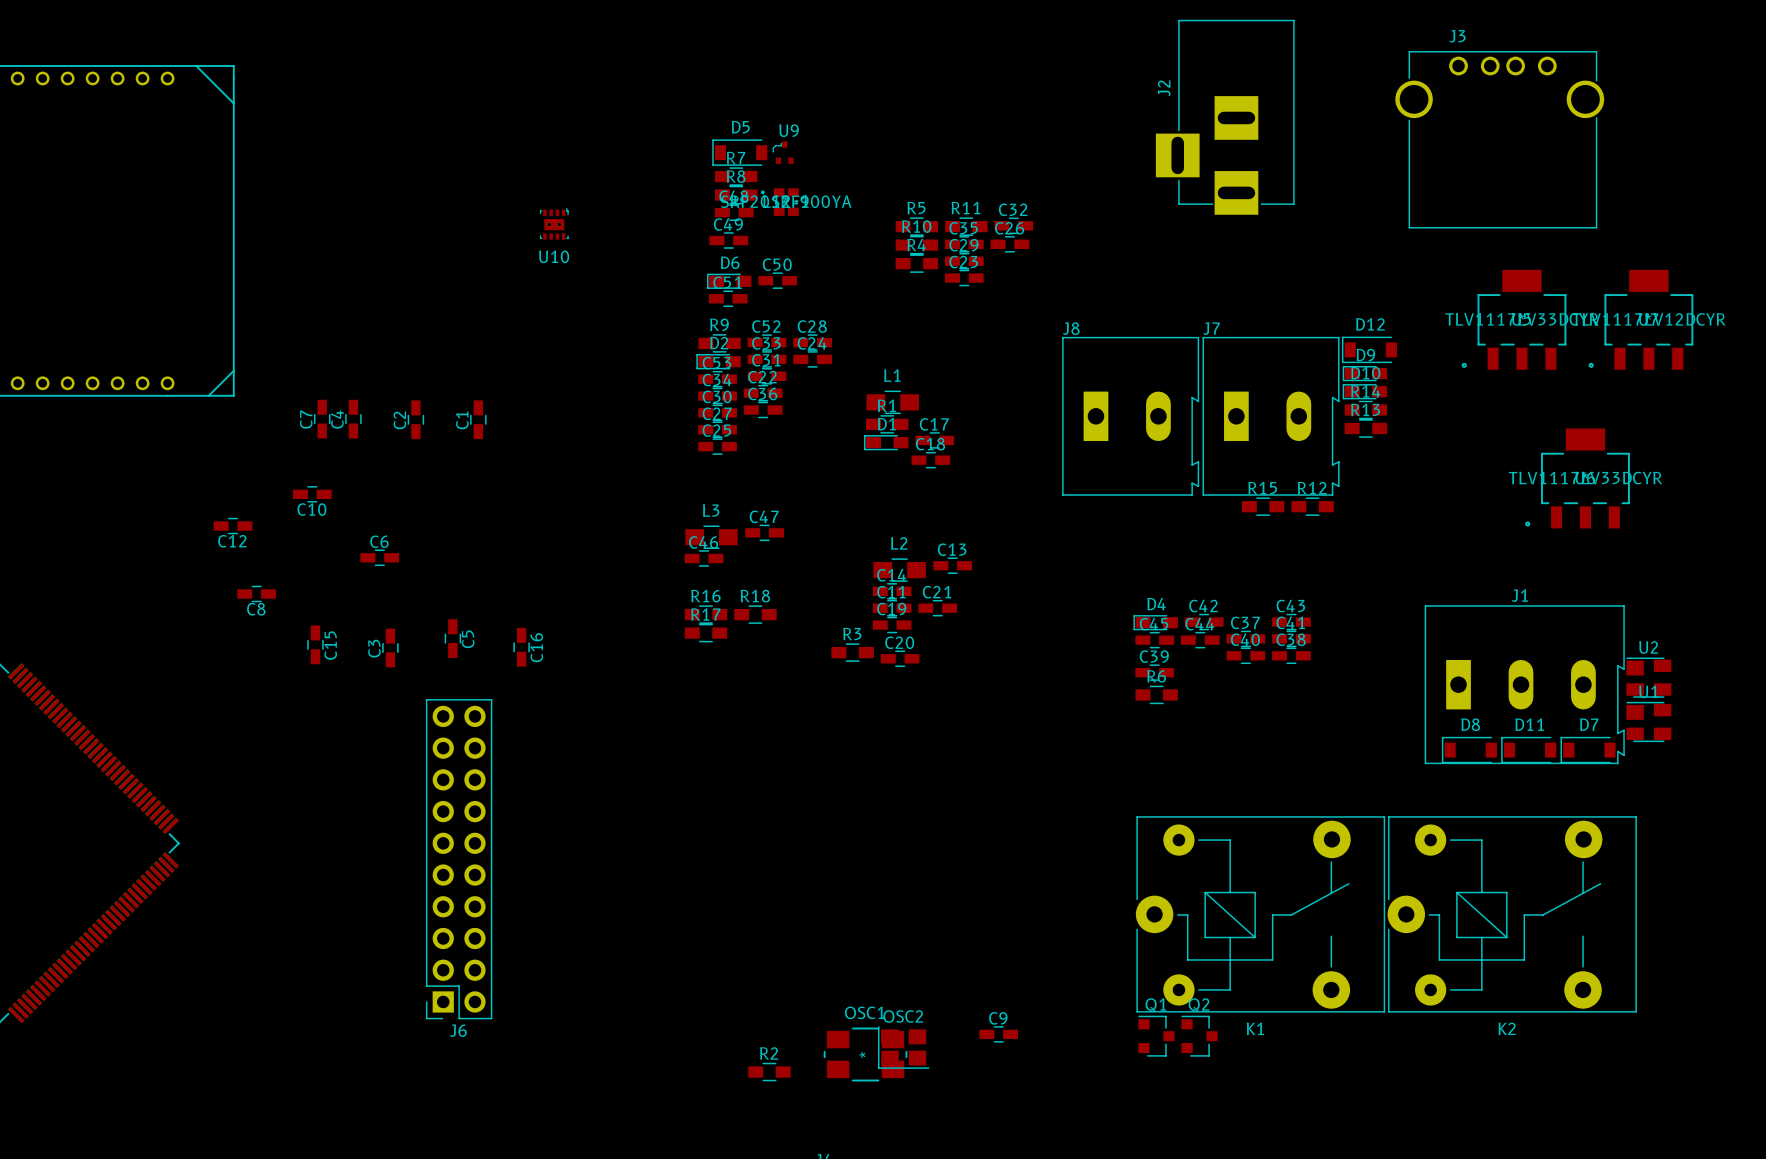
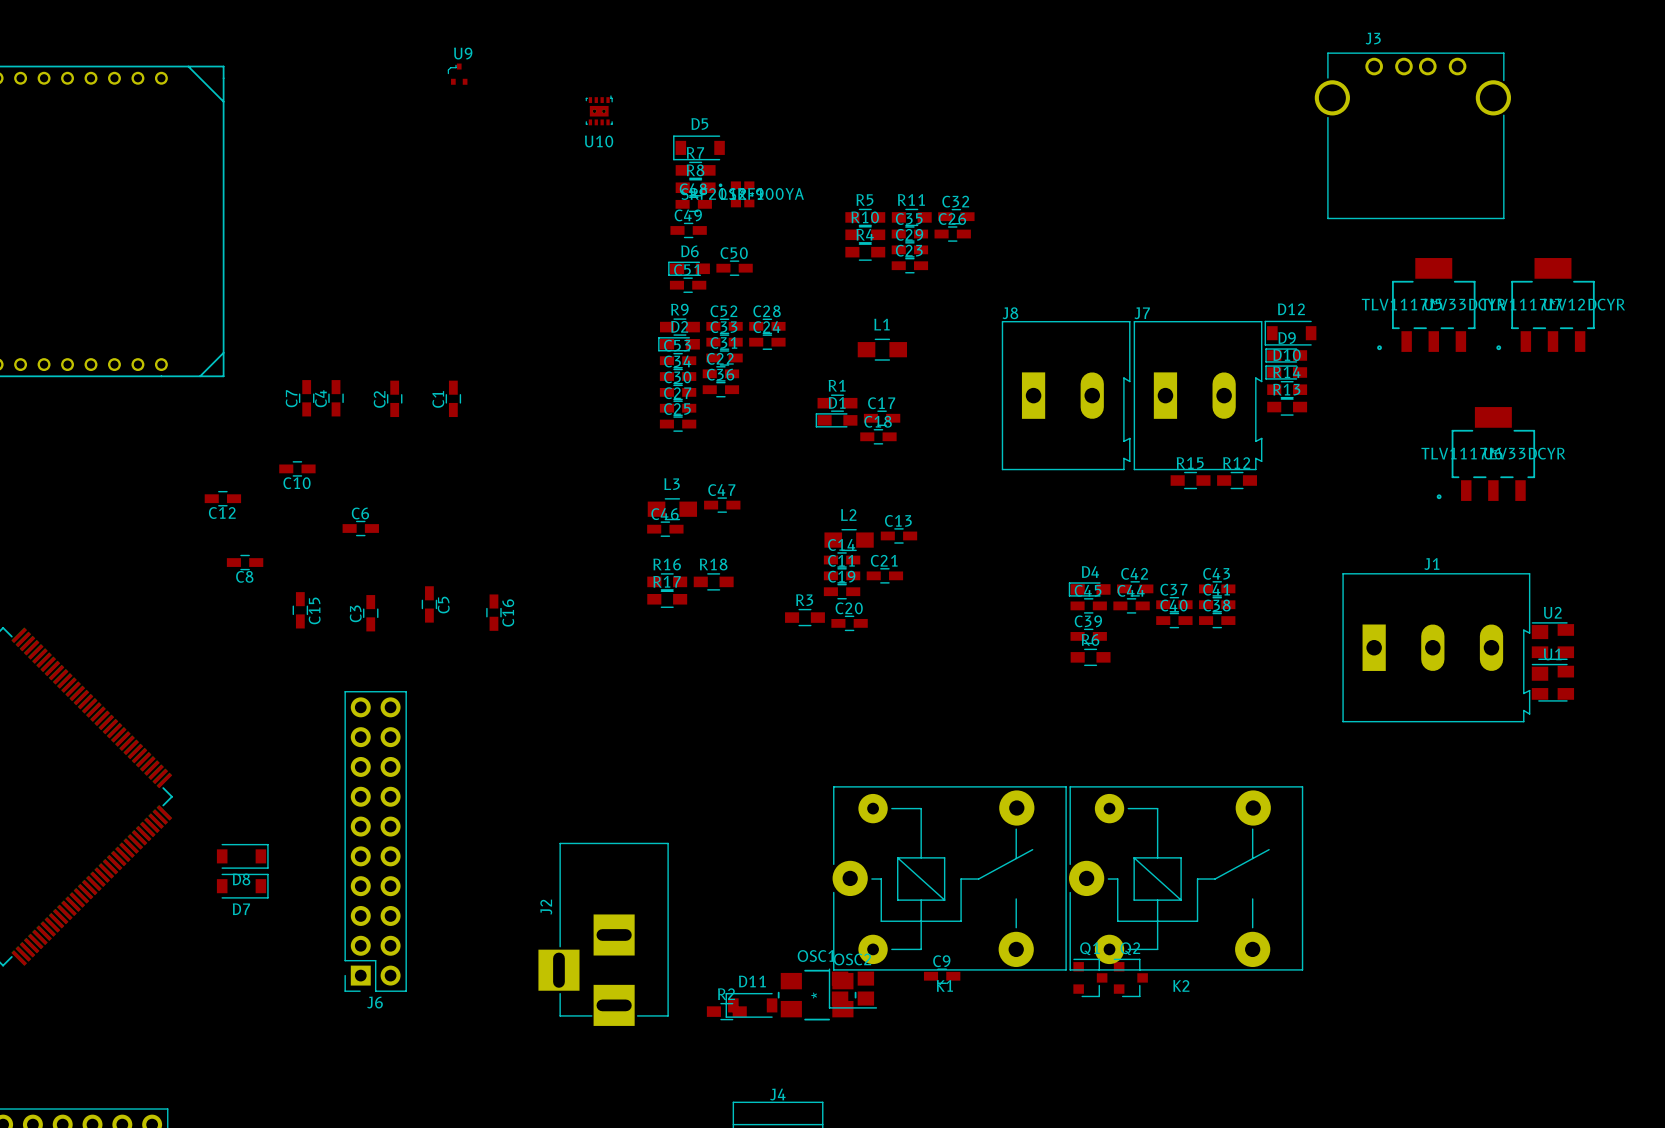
J2 position: (1225, 117) -> (603, 934)
U9 position: (783, 152) -> (457, 74)
U10 position: (554, 223) -> (599, 110)
L1 position: (892, 402) -> (882, 349)
D8 rotation: 0° (1469, 750) -> 180° (242, 856)
D8 position: (1469, 750) -> (242, 856)
D11 position: (1528, 750) -> (751, 1005)
D7 rotation: 0° (1588, 750) -> 180° (242, 886)
D7 position: (1588, 750) -> (242, 886)
J6 position: (459, 859) -> (375, 841)
K1 position: (1260, 914) -> (949, 878)
K2 position: (1512, 914) -> (1186, 878)

